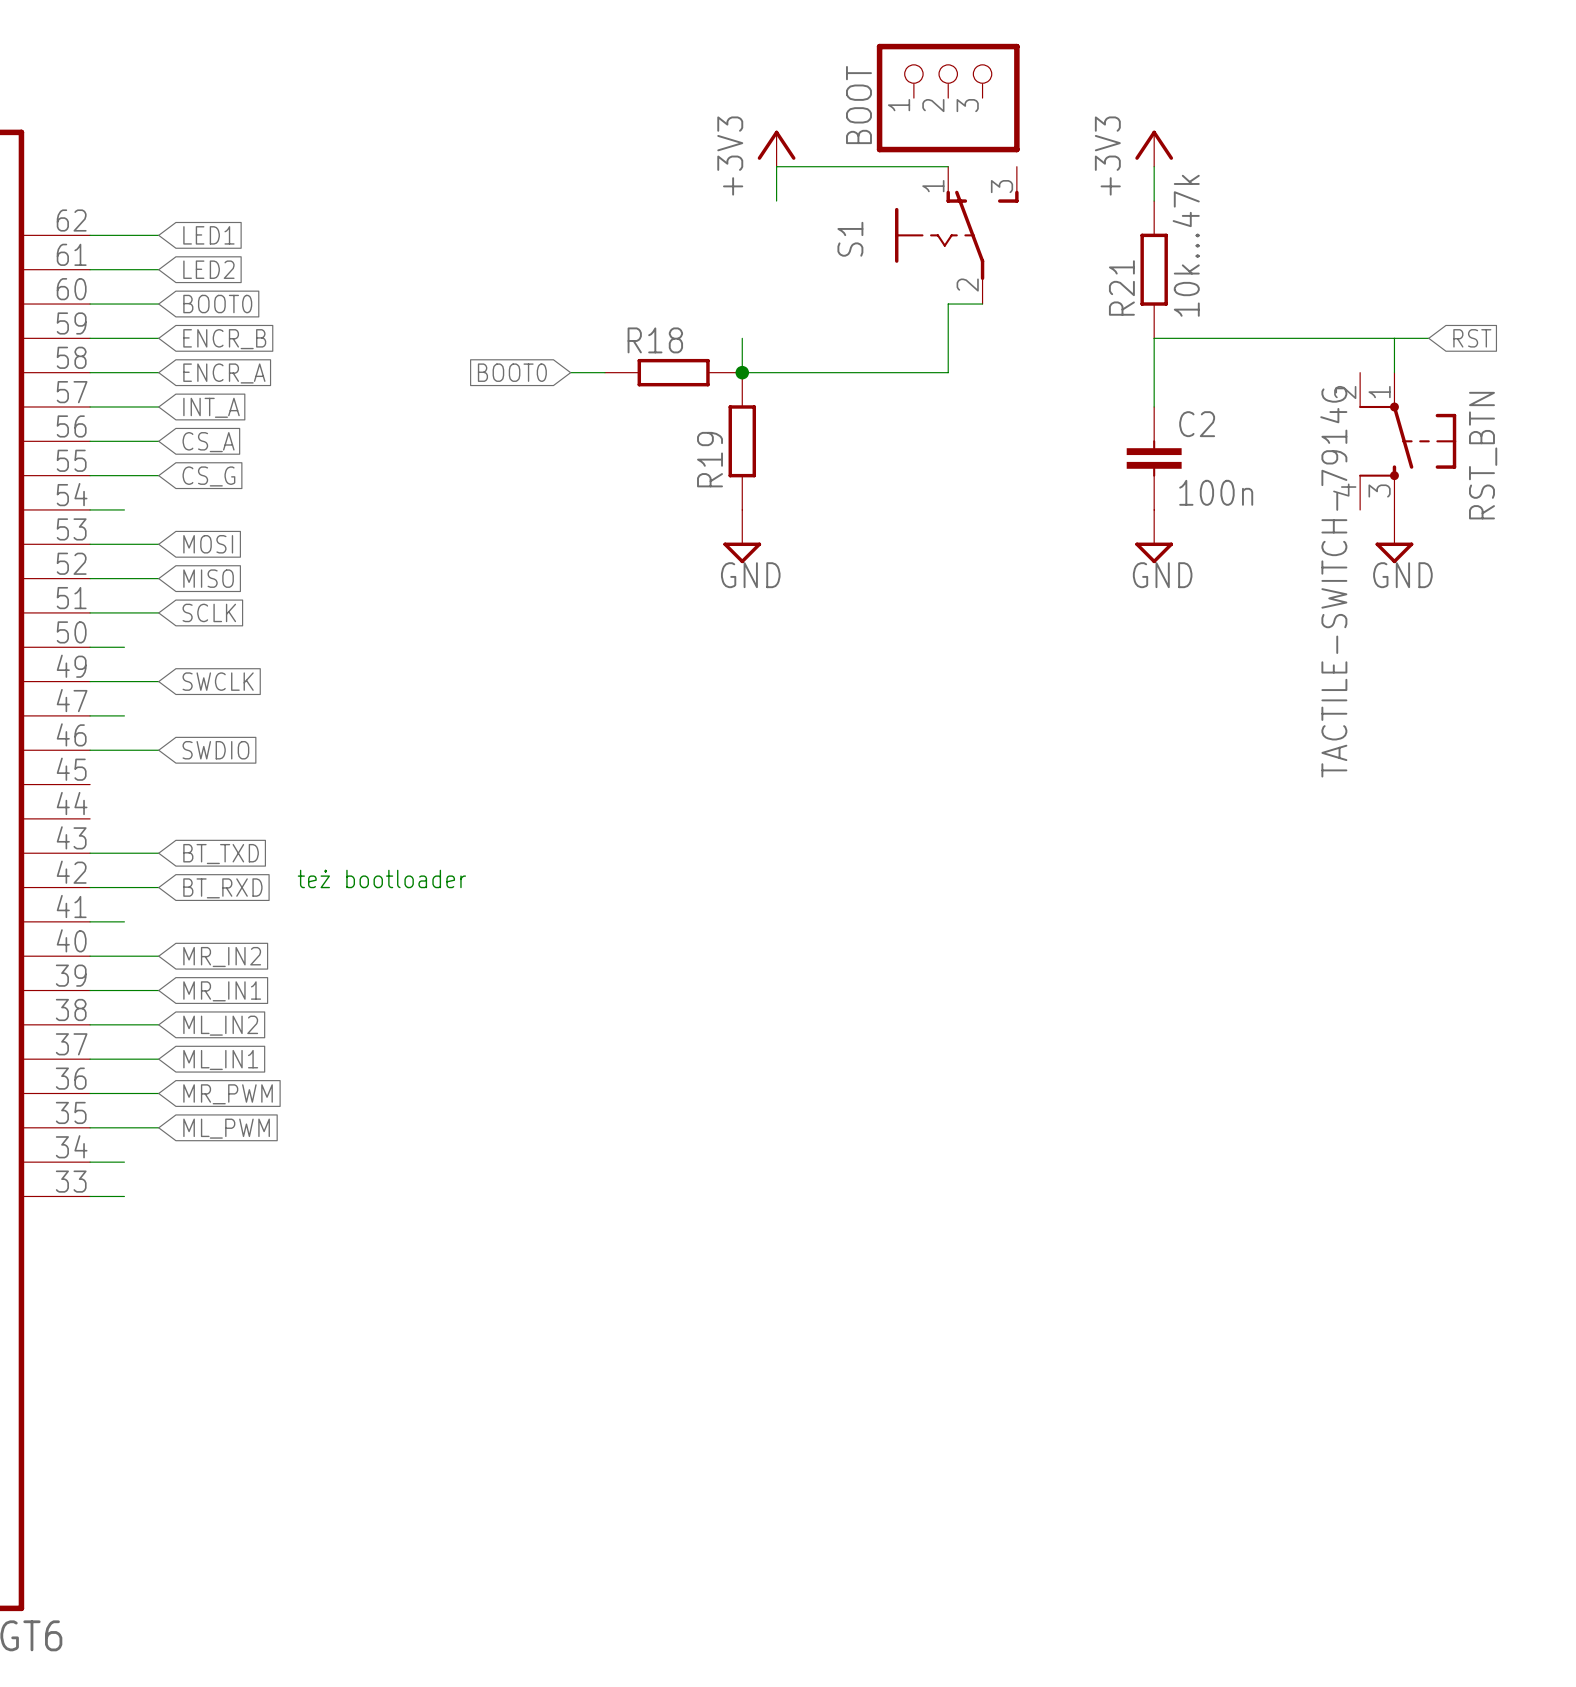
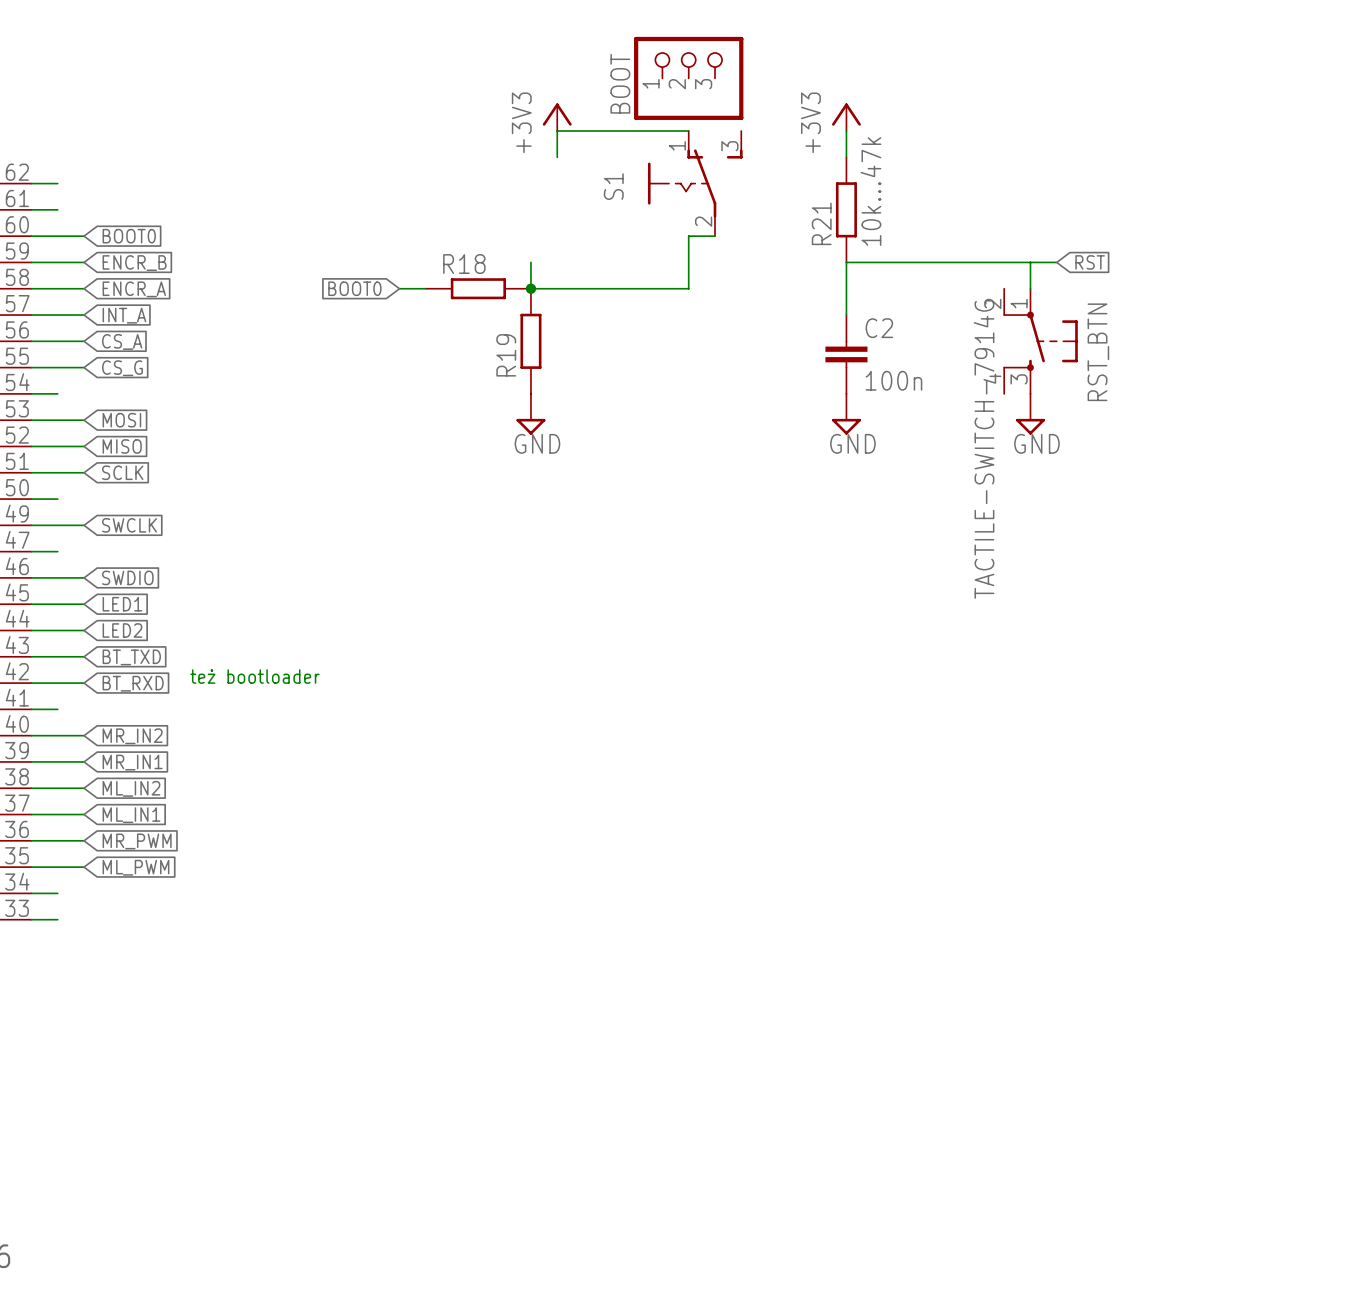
wire: (124, 235) (158, 235) -> none
global label: LED1 (208, 235) -> none
wire: (124, 269) (158, 269) -> none
global label: LED2 (208, 269) -> none
wire: none -> (31, 604) (84, 604)
global label: none -> LED1 (122, 604)
wire: none -> (31, 630) (84, 630)
global label: none -> LED2 (122, 630)

